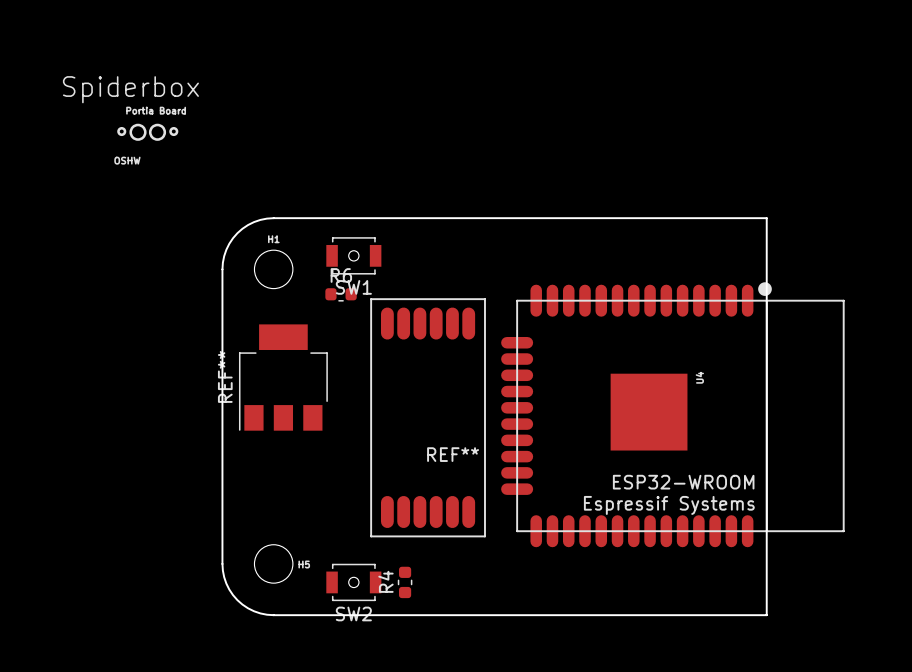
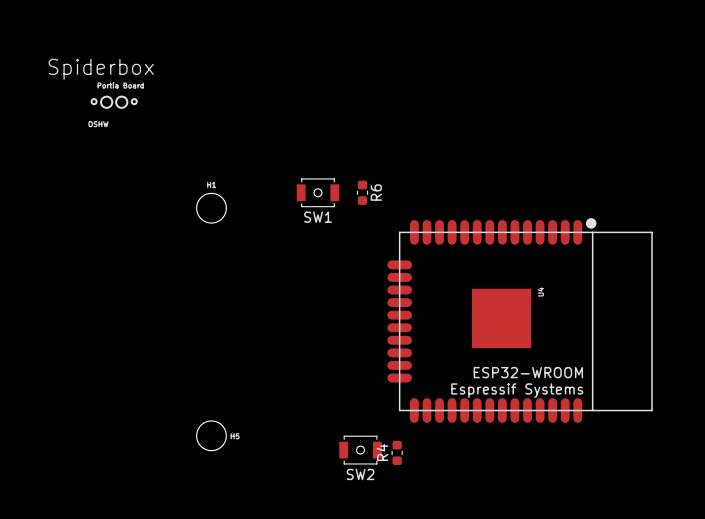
board edge: (273, 218) (766, 218) (766, 615) (273, 615) (254, 611) (242, 604) (229, 589) (224, 577) (222, 563) (222, 262) (229, 243) (242, 228) (260, 219) (273, 218) -> none
SW1 position: (353, 255) -> (317, 192)
R6 rotation: 0° (341, 294) -> 90° clockwise (362, 192)
R6 position: (341, 294) -> (362, 192)
REF**: (283, 377) -> none
REF**: (428, 417) -> none
SW2 position: (353, 582) -> (360, 450)
R4 position: (405, 582) -> (397, 452)

